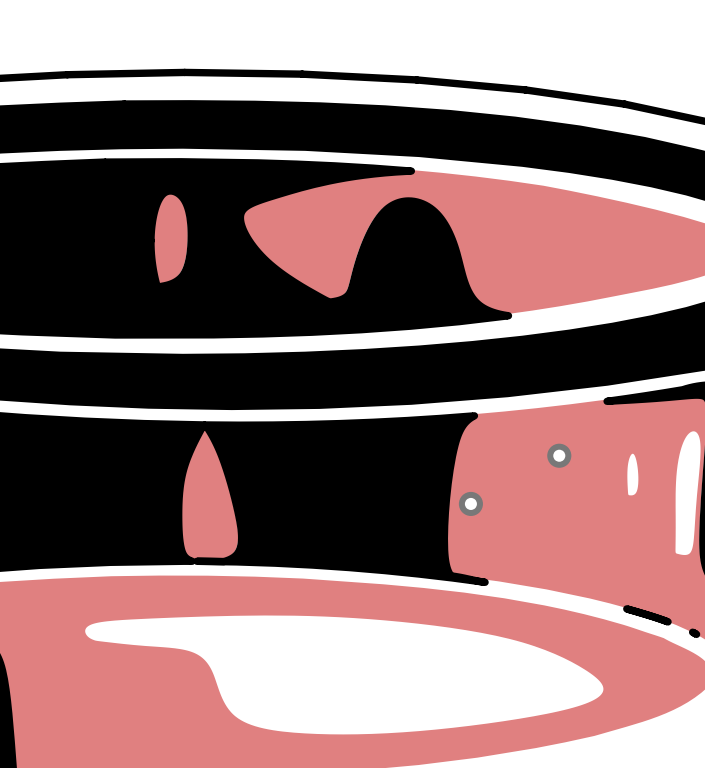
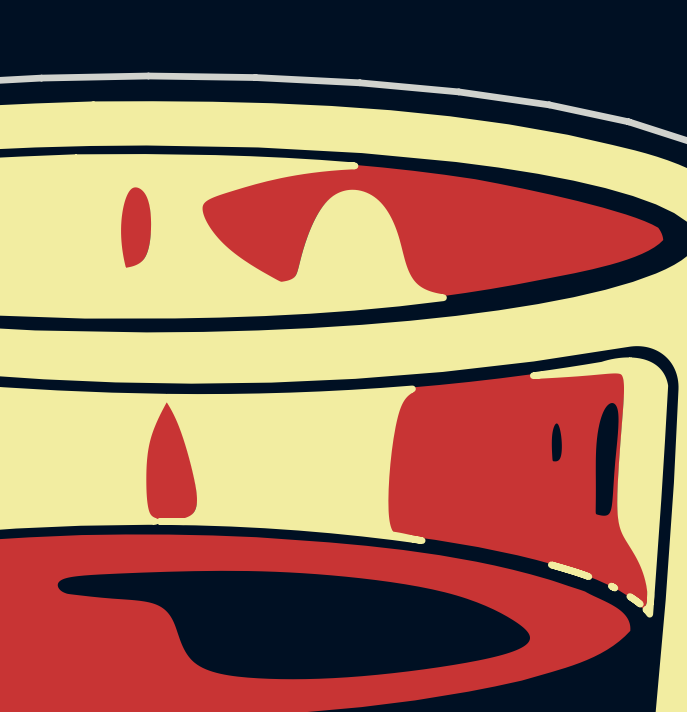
via: (559, 455) -> none
via: (470, 503) -> none

